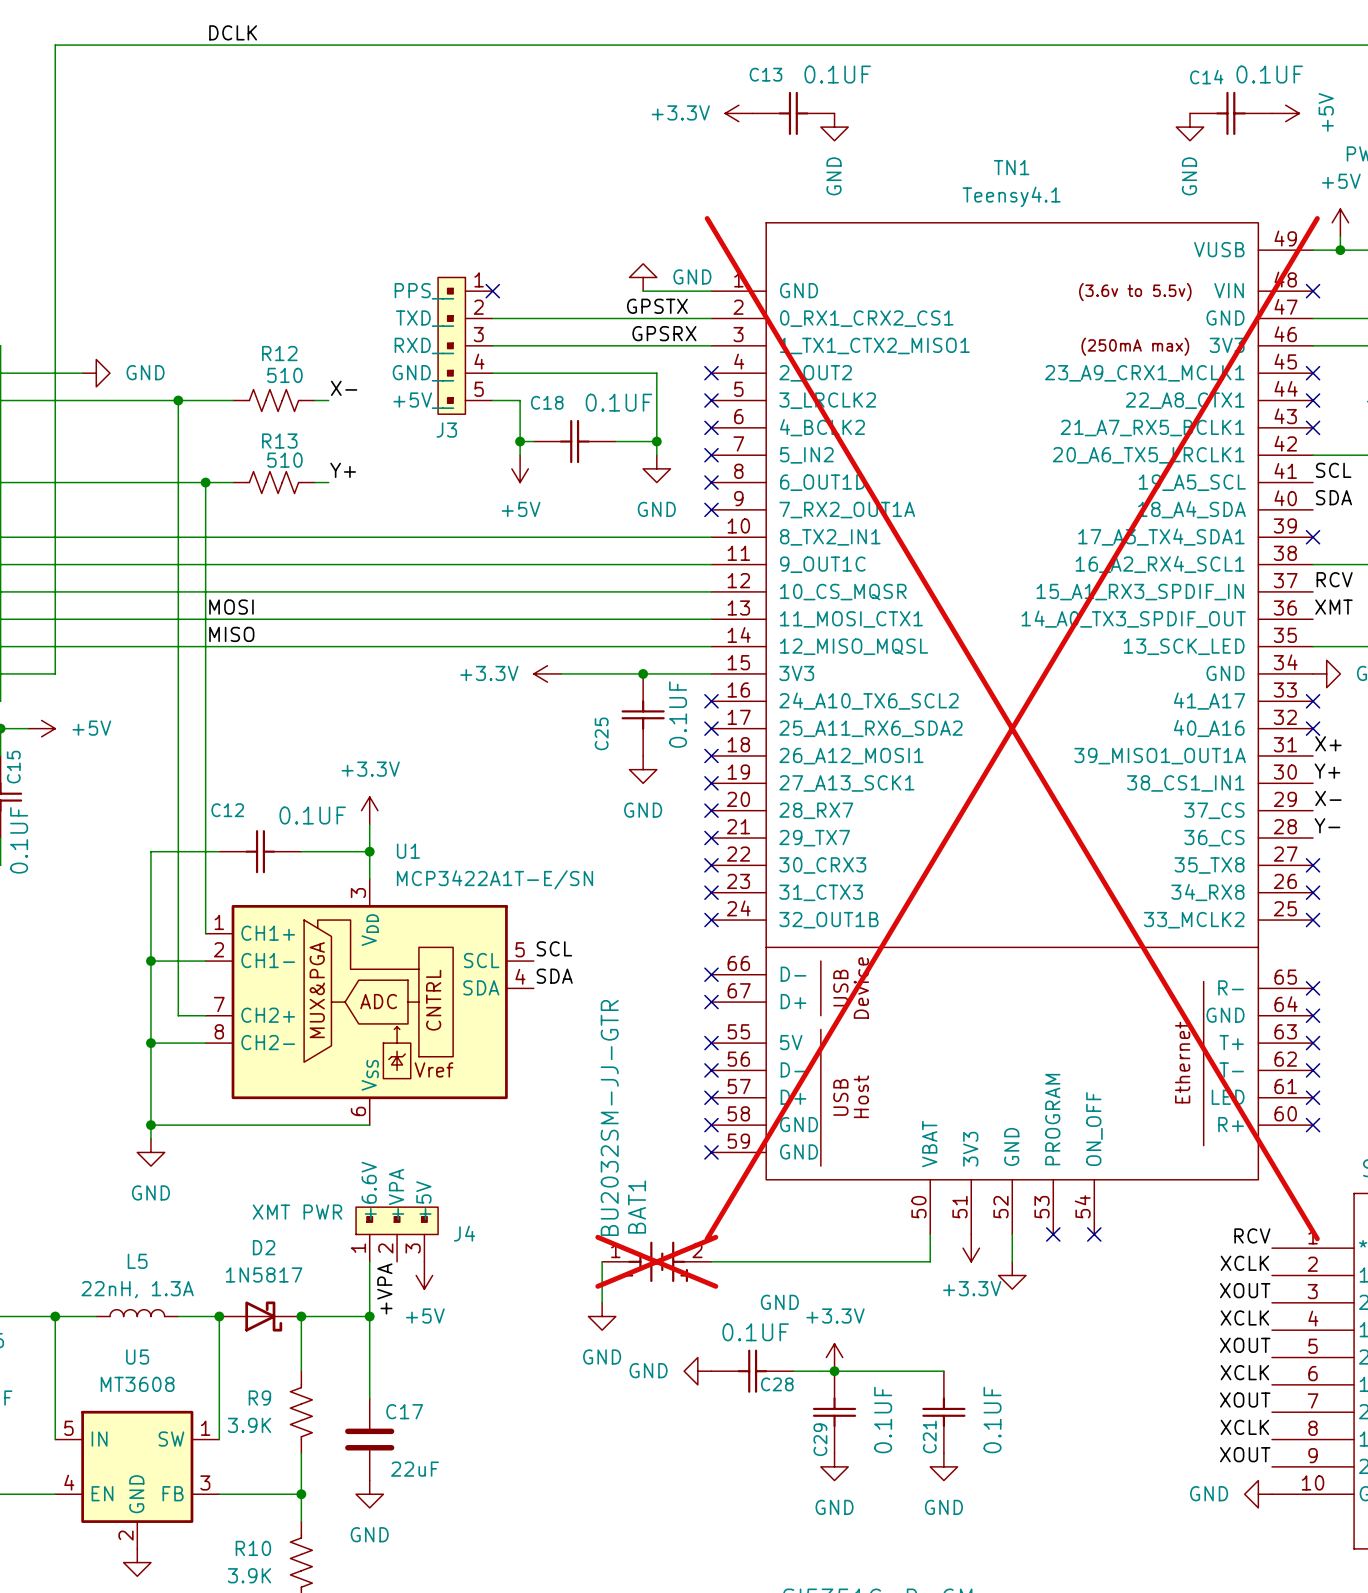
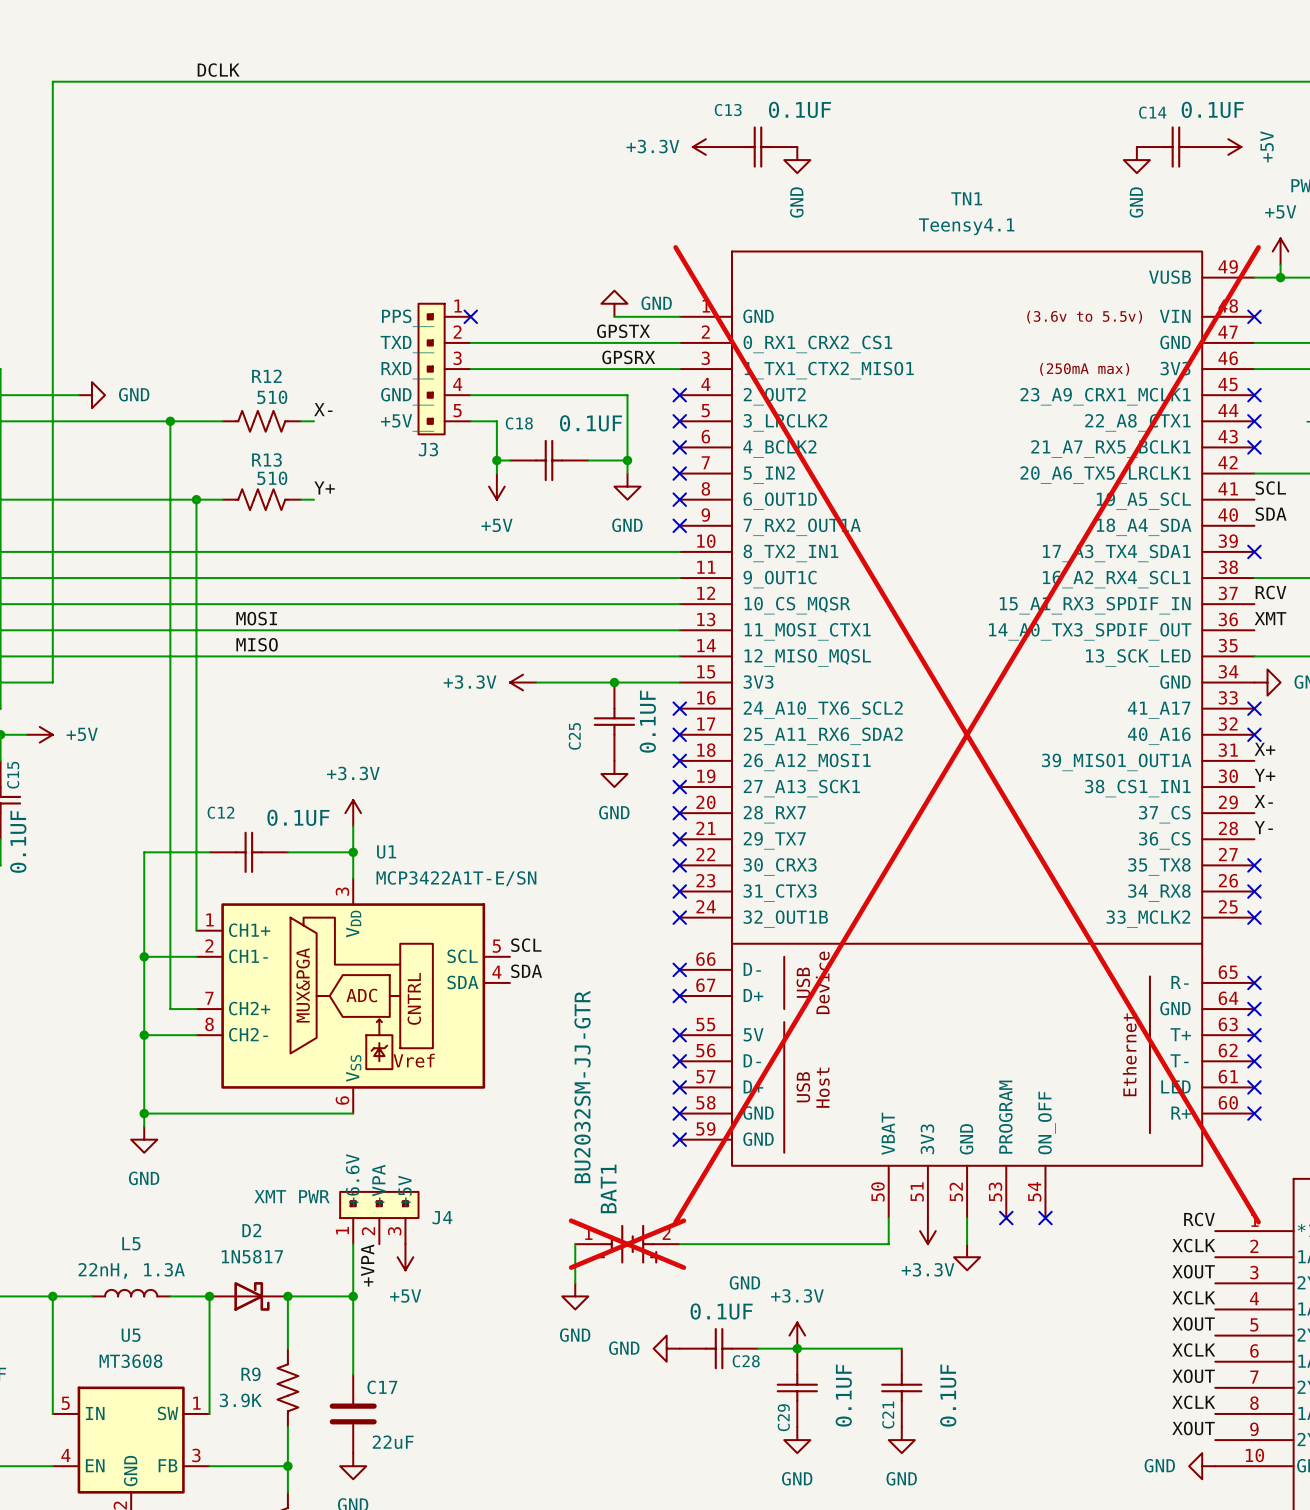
label position: MOSI (231, 607) -> MOSI (256, 618)
label position: MISO (231, 634) -> MISO (257, 644)

